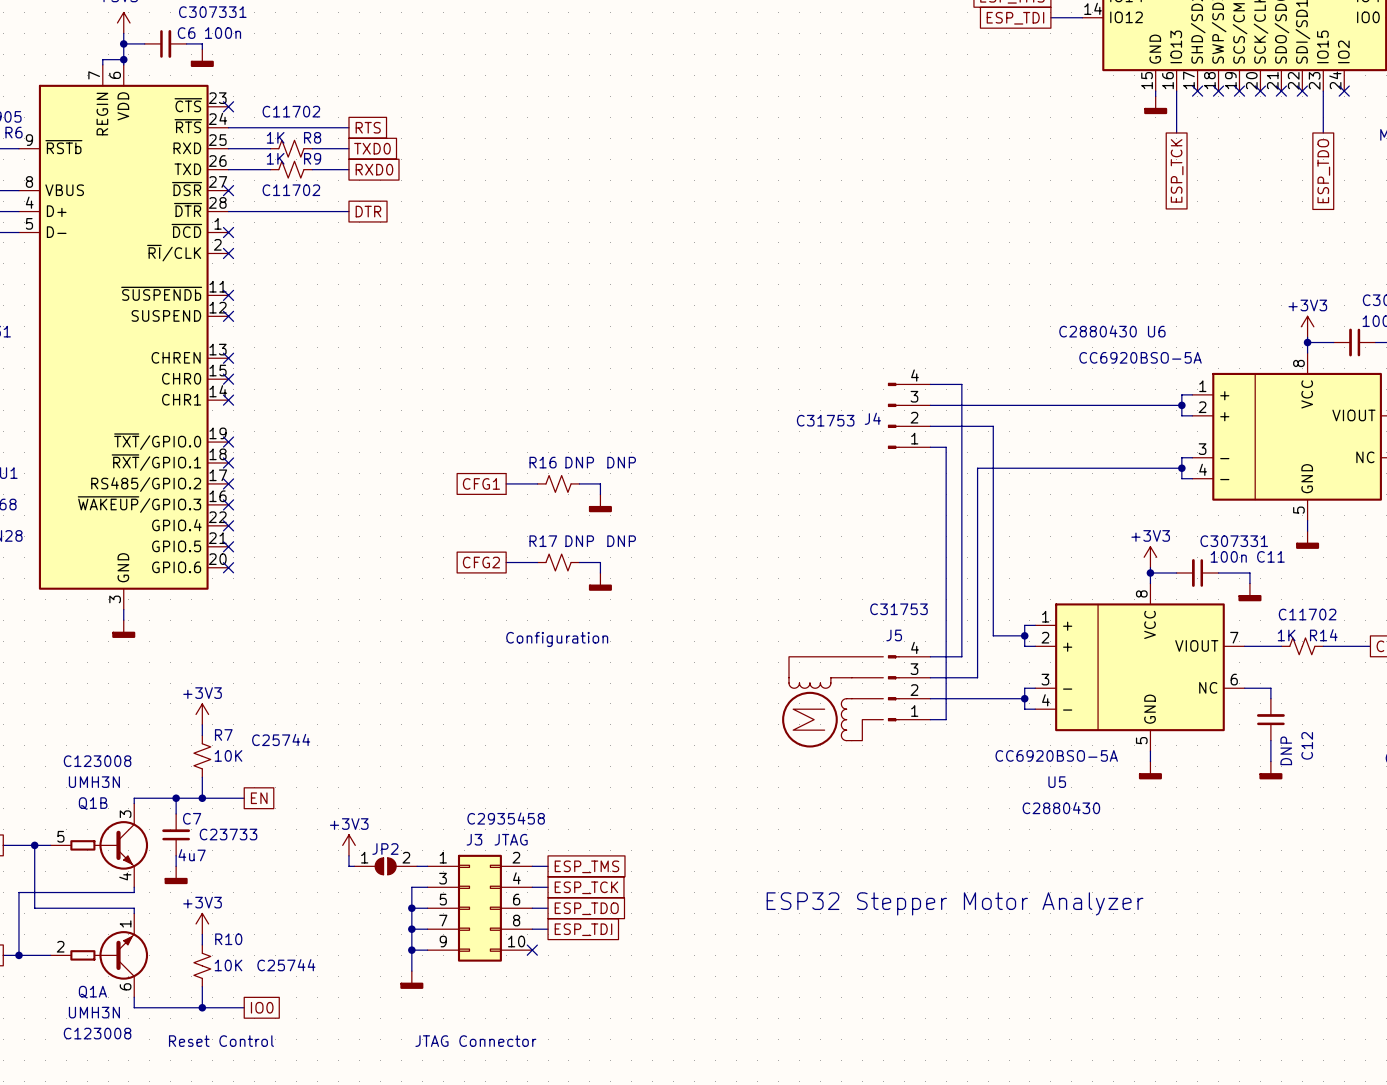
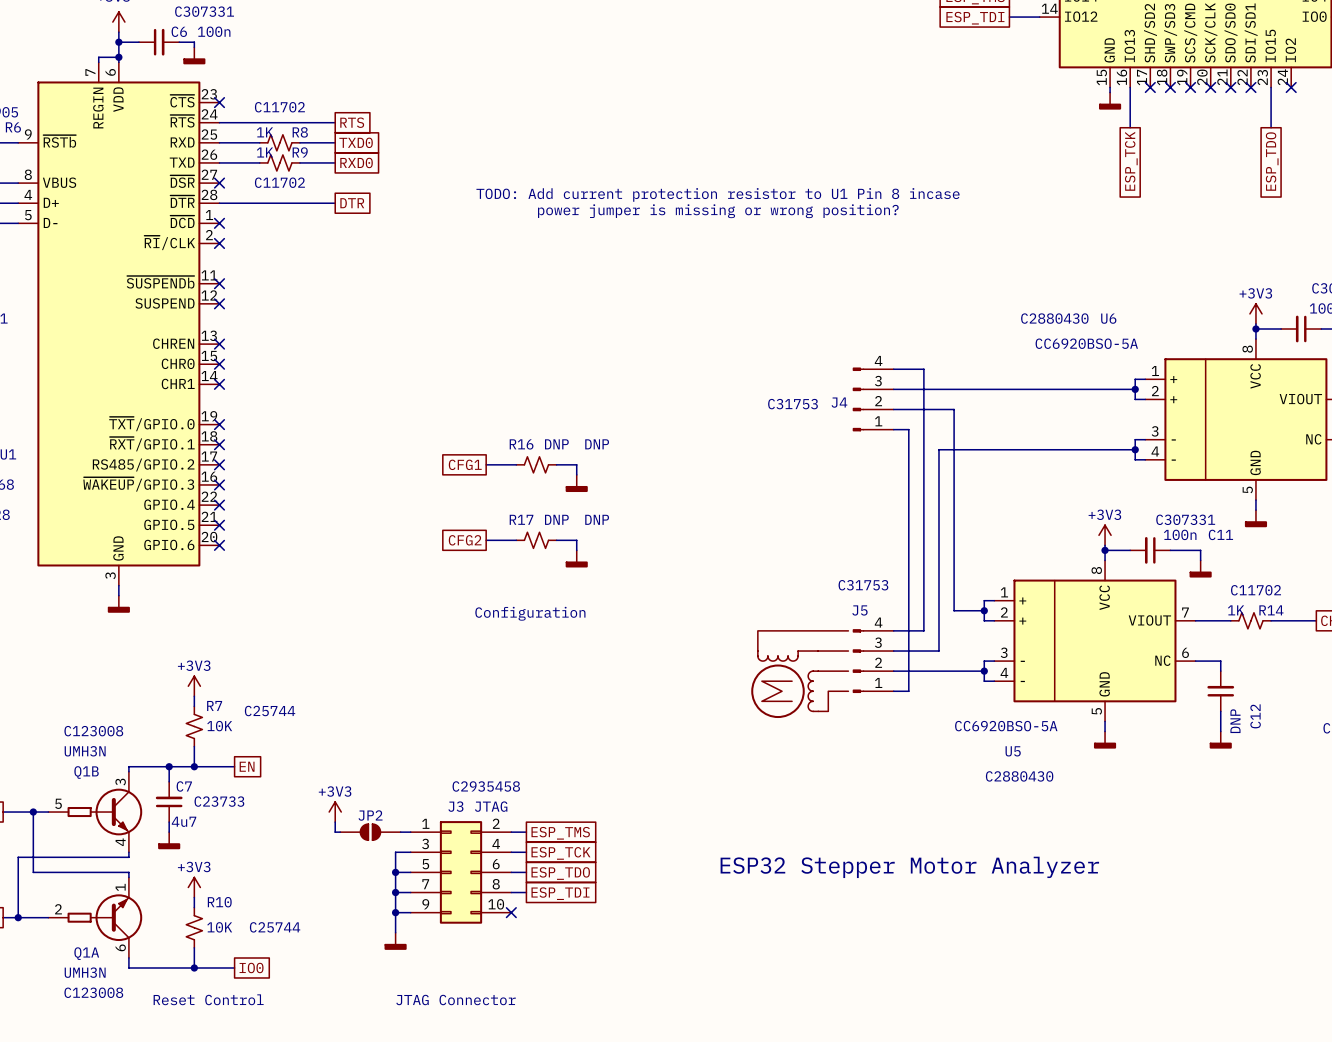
text: none -> TODO: Add current protection resistor to U1 Pin 8 incase (718, 194)
text: none -> power jumper is missing or wrong position? (718, 211)
JP2 pin number: 1 (364, 857) -> none
JP2 pin number: 2 (406, 857) -> none

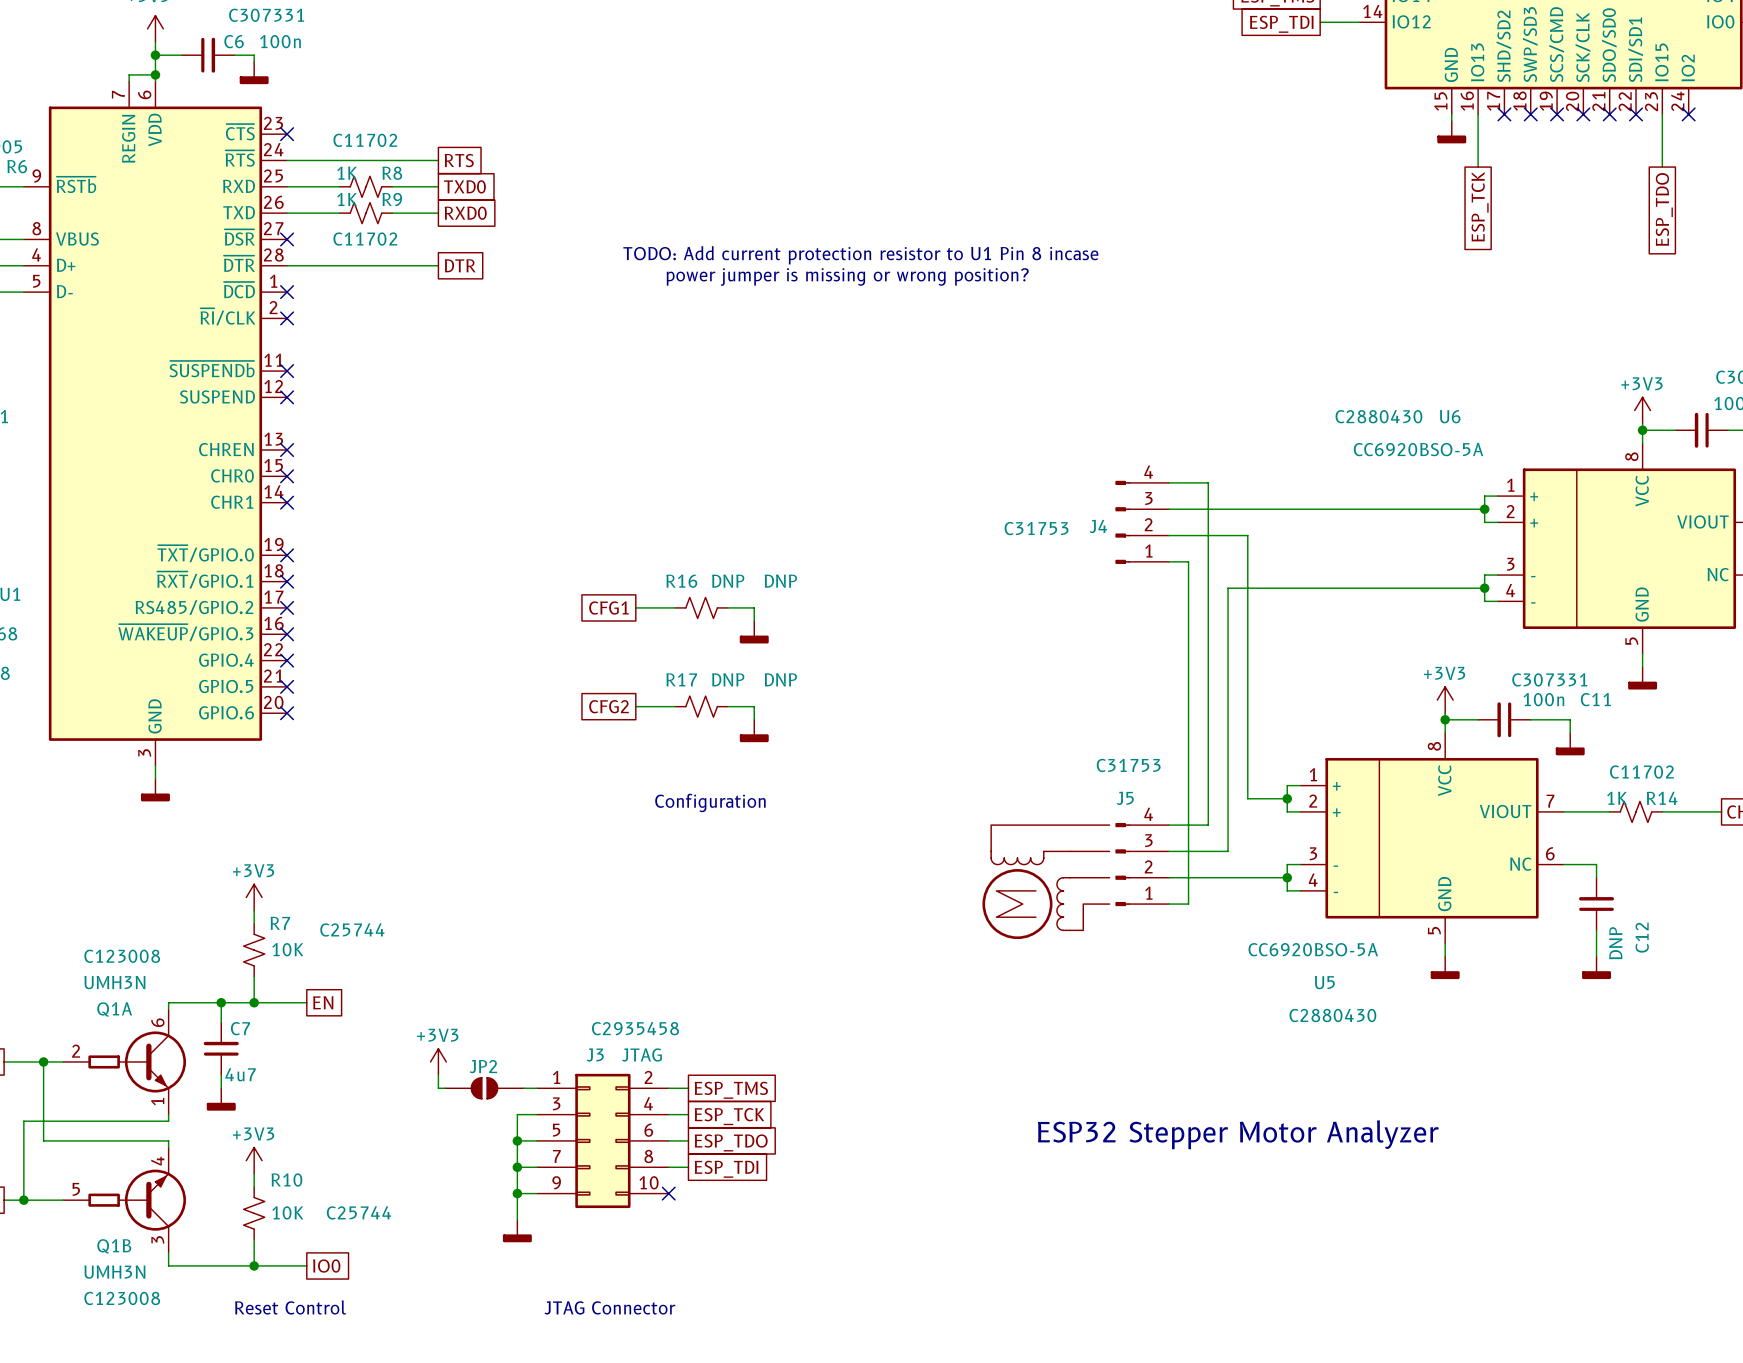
C7 text: C23733 (219, 801) -> none
Q1B position: (95, 812) -> (124, 1200)
Q1B flip: as is (104, 812) -> up-down (137, 1200)
Q1A position: (95, 917) -> (124, 1061)
Q1A flip: as is (104, 917) -> up-down (137, 1061)

